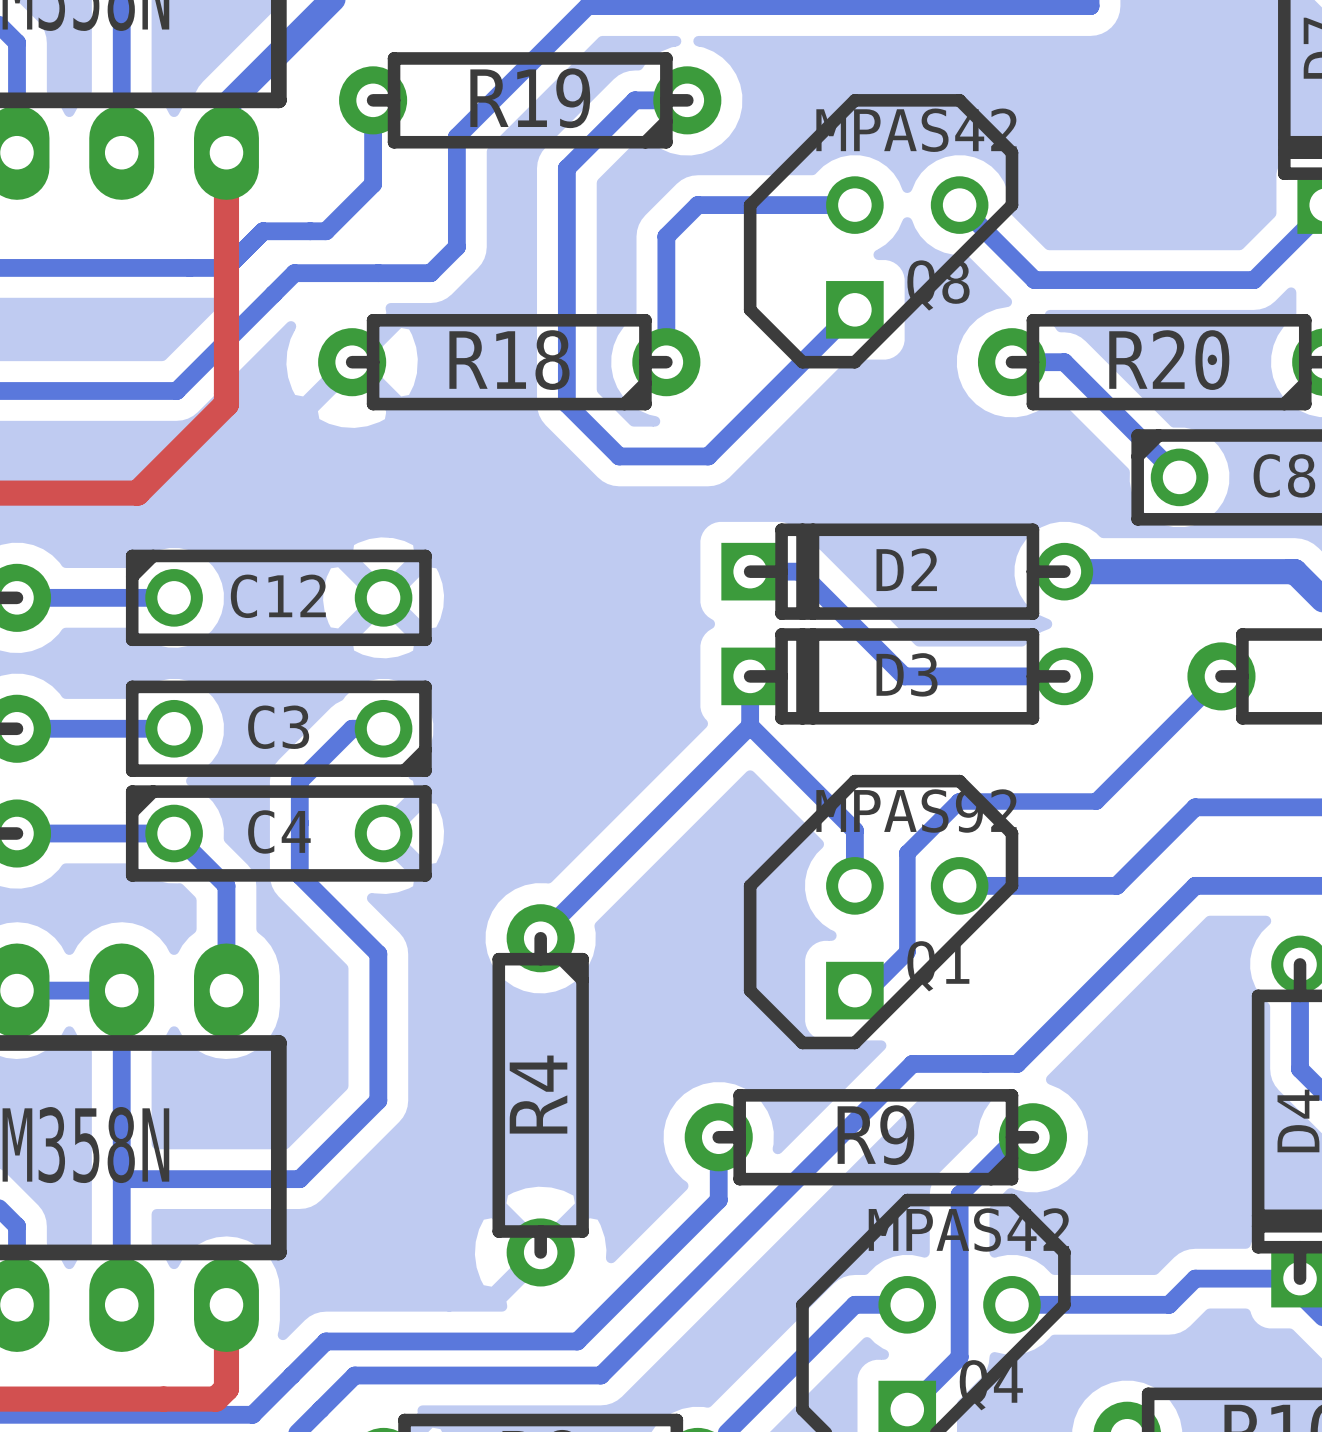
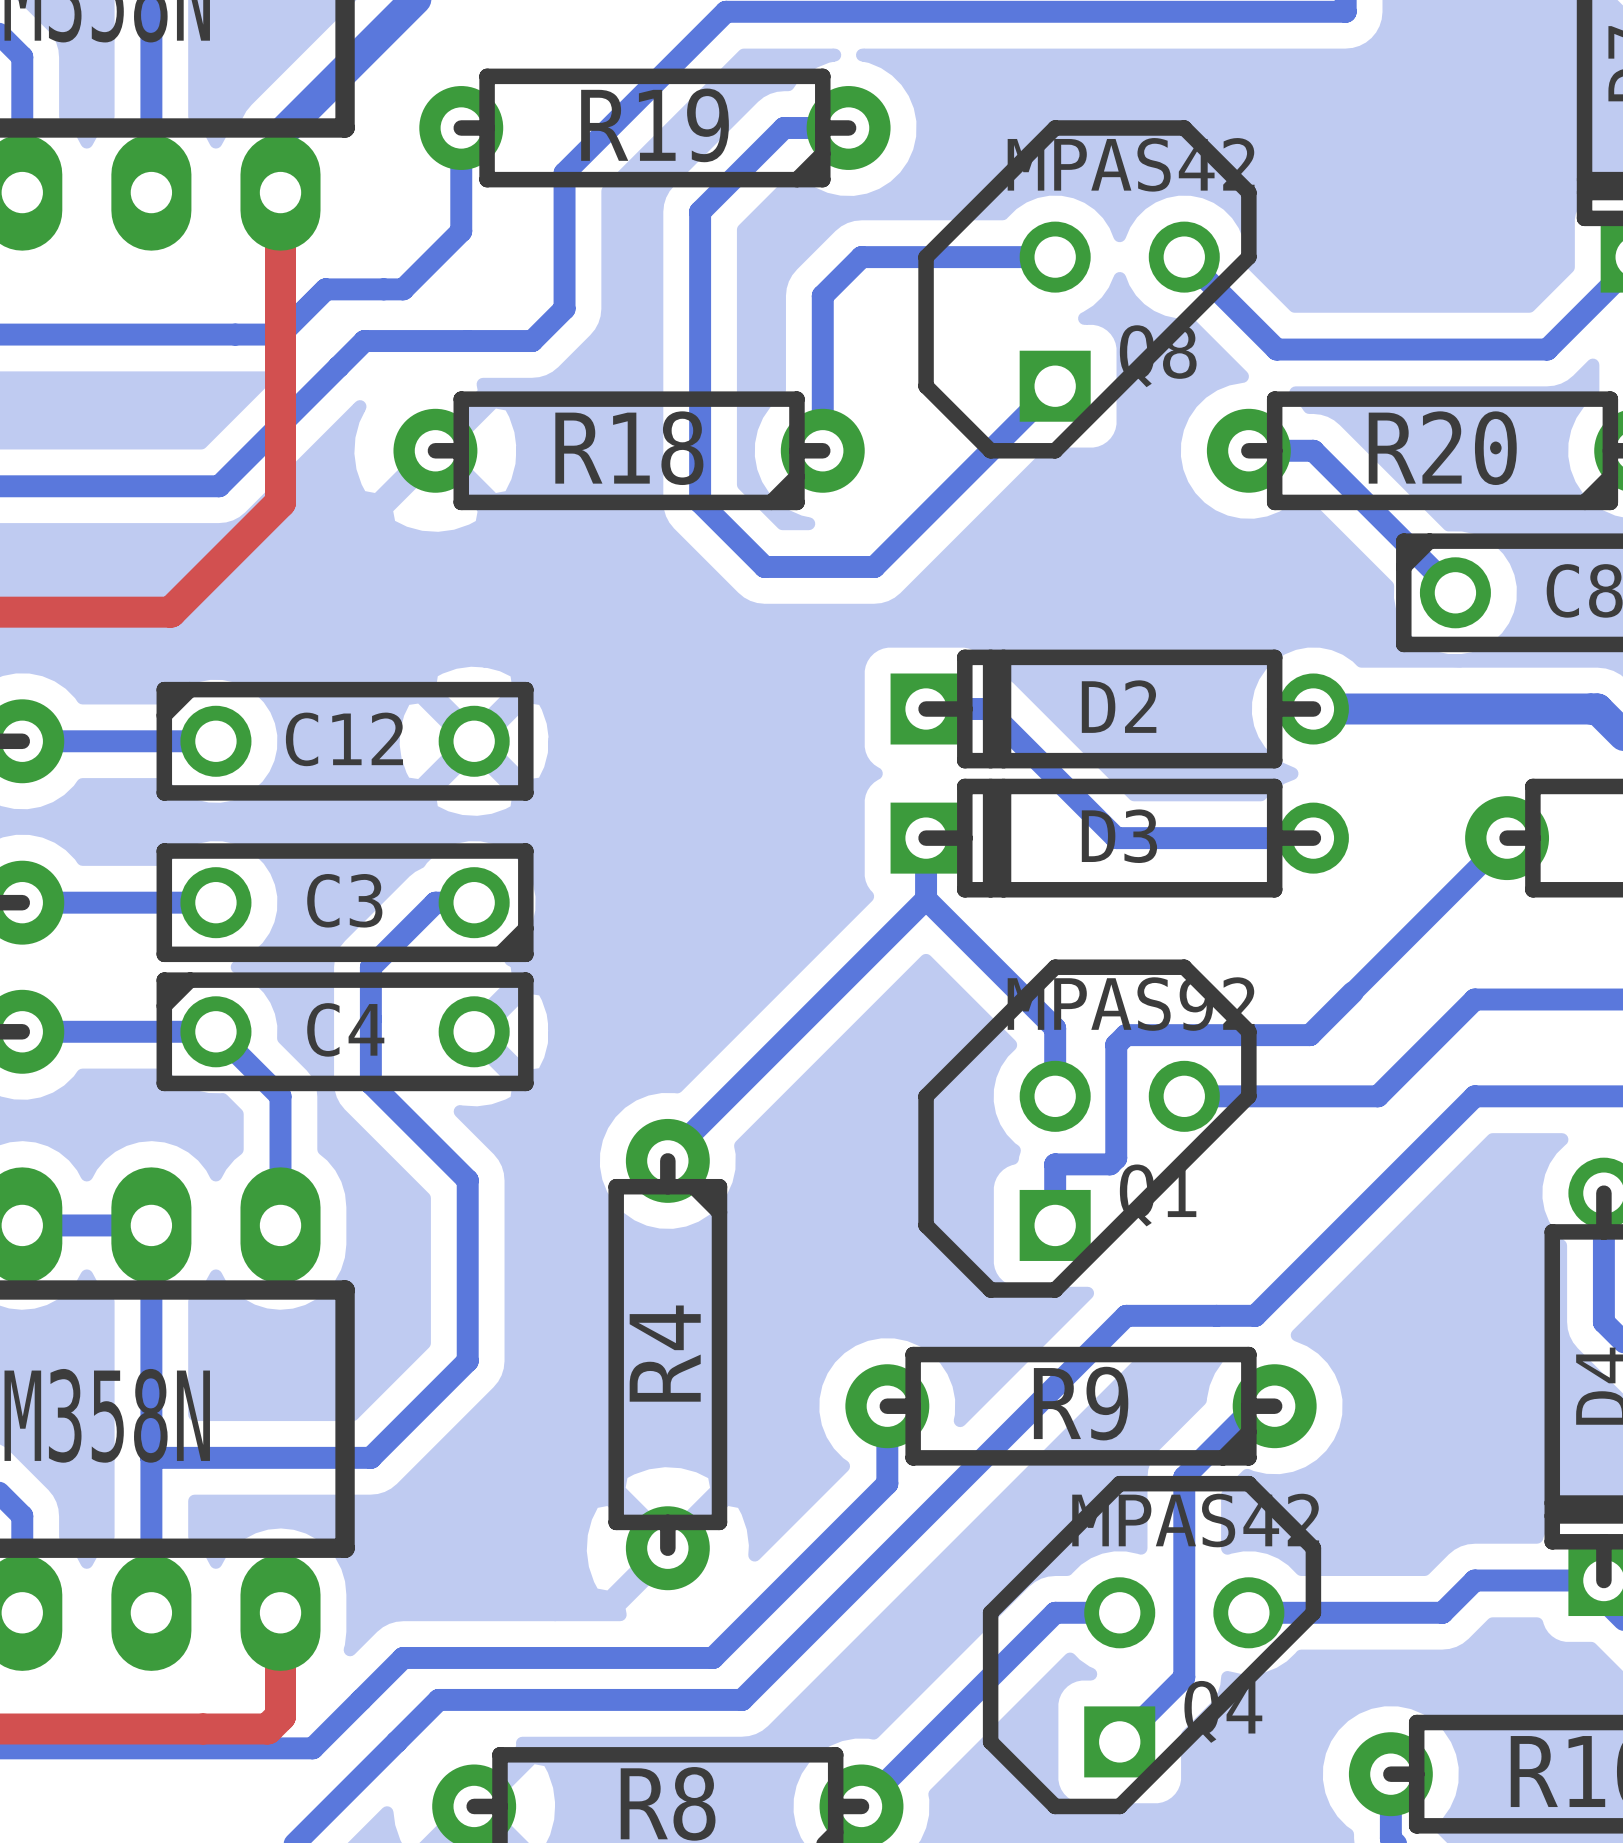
bottom track: (1096, 801) (959, 801) (907, 853) (907, 952) (868, 990) (854, 990) -> (1352, 992) (1310, 1035) (1125, 1035) (1116, 1044) (1116, 1158) (1110, 1164) (1055, 1164) (1055, 1225)

